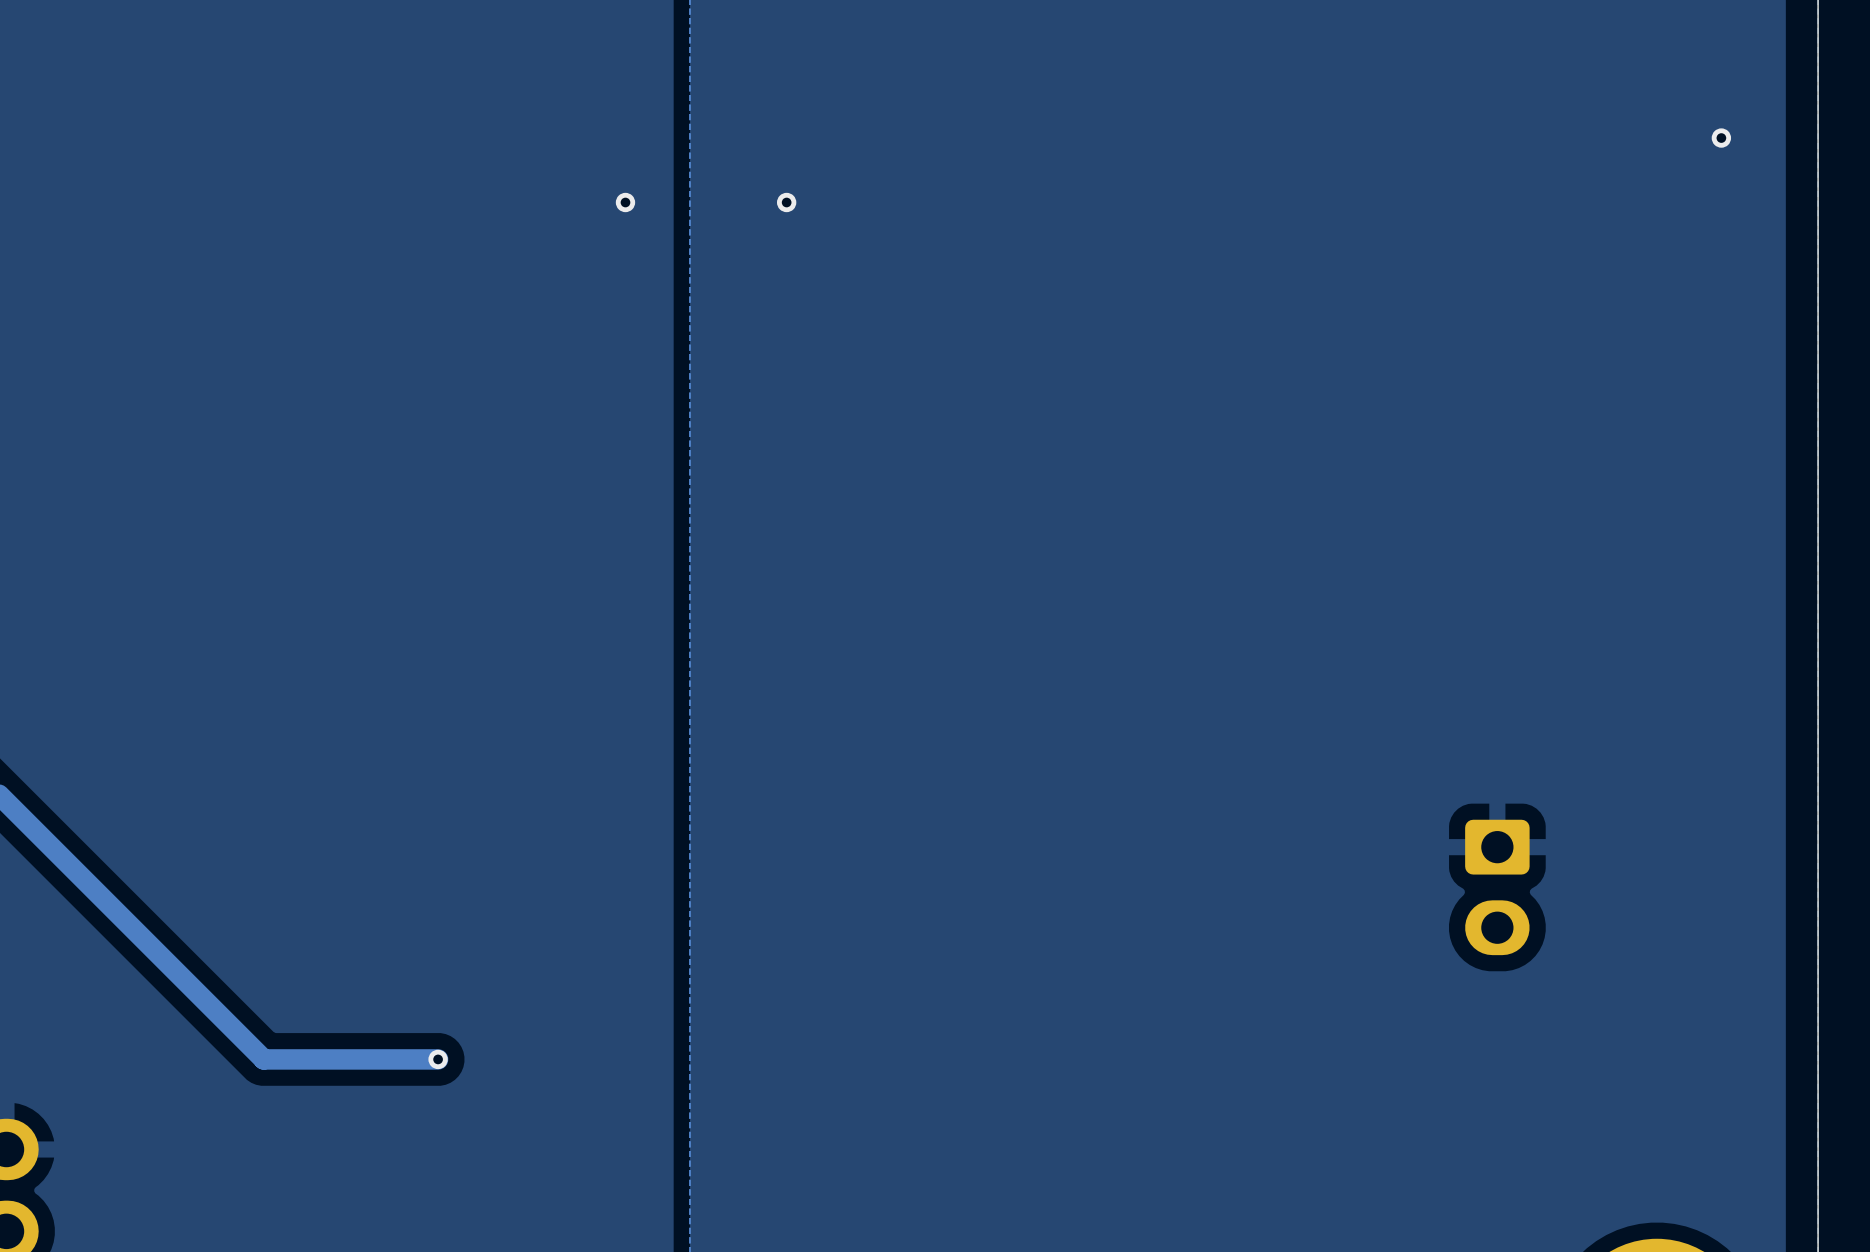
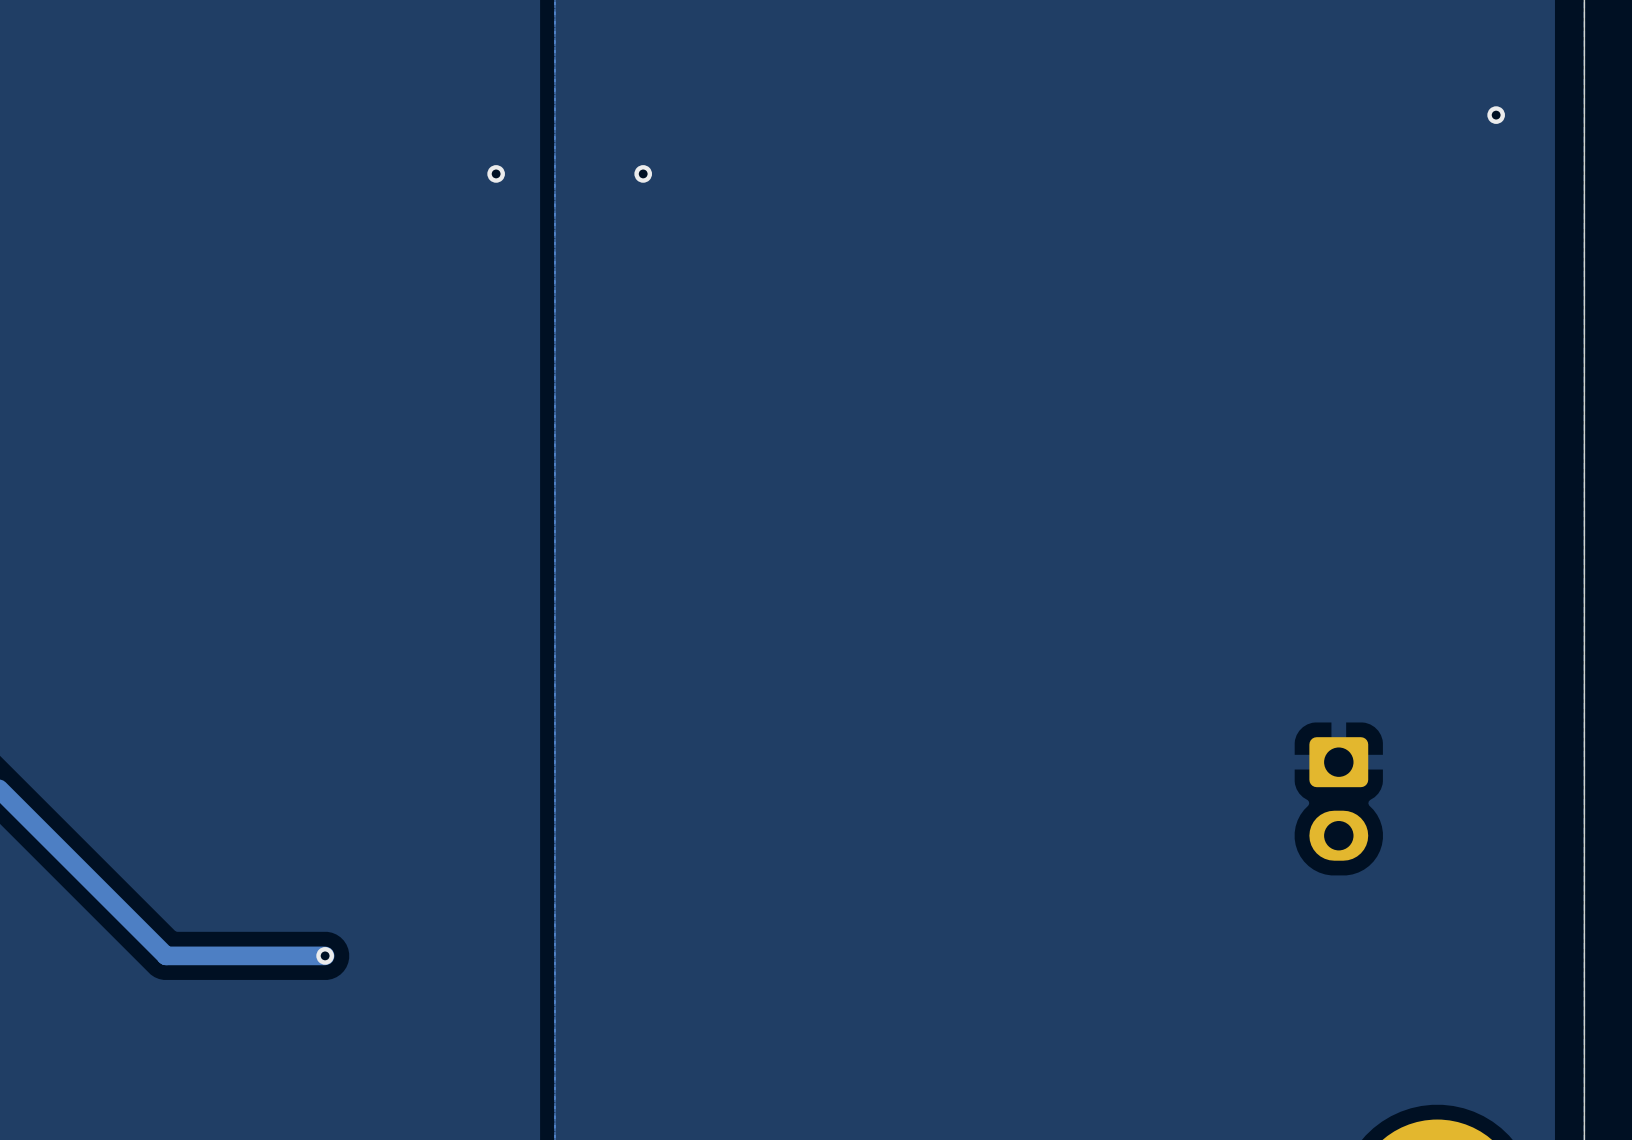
part position: (1497, 887) -> (1338, 798)

